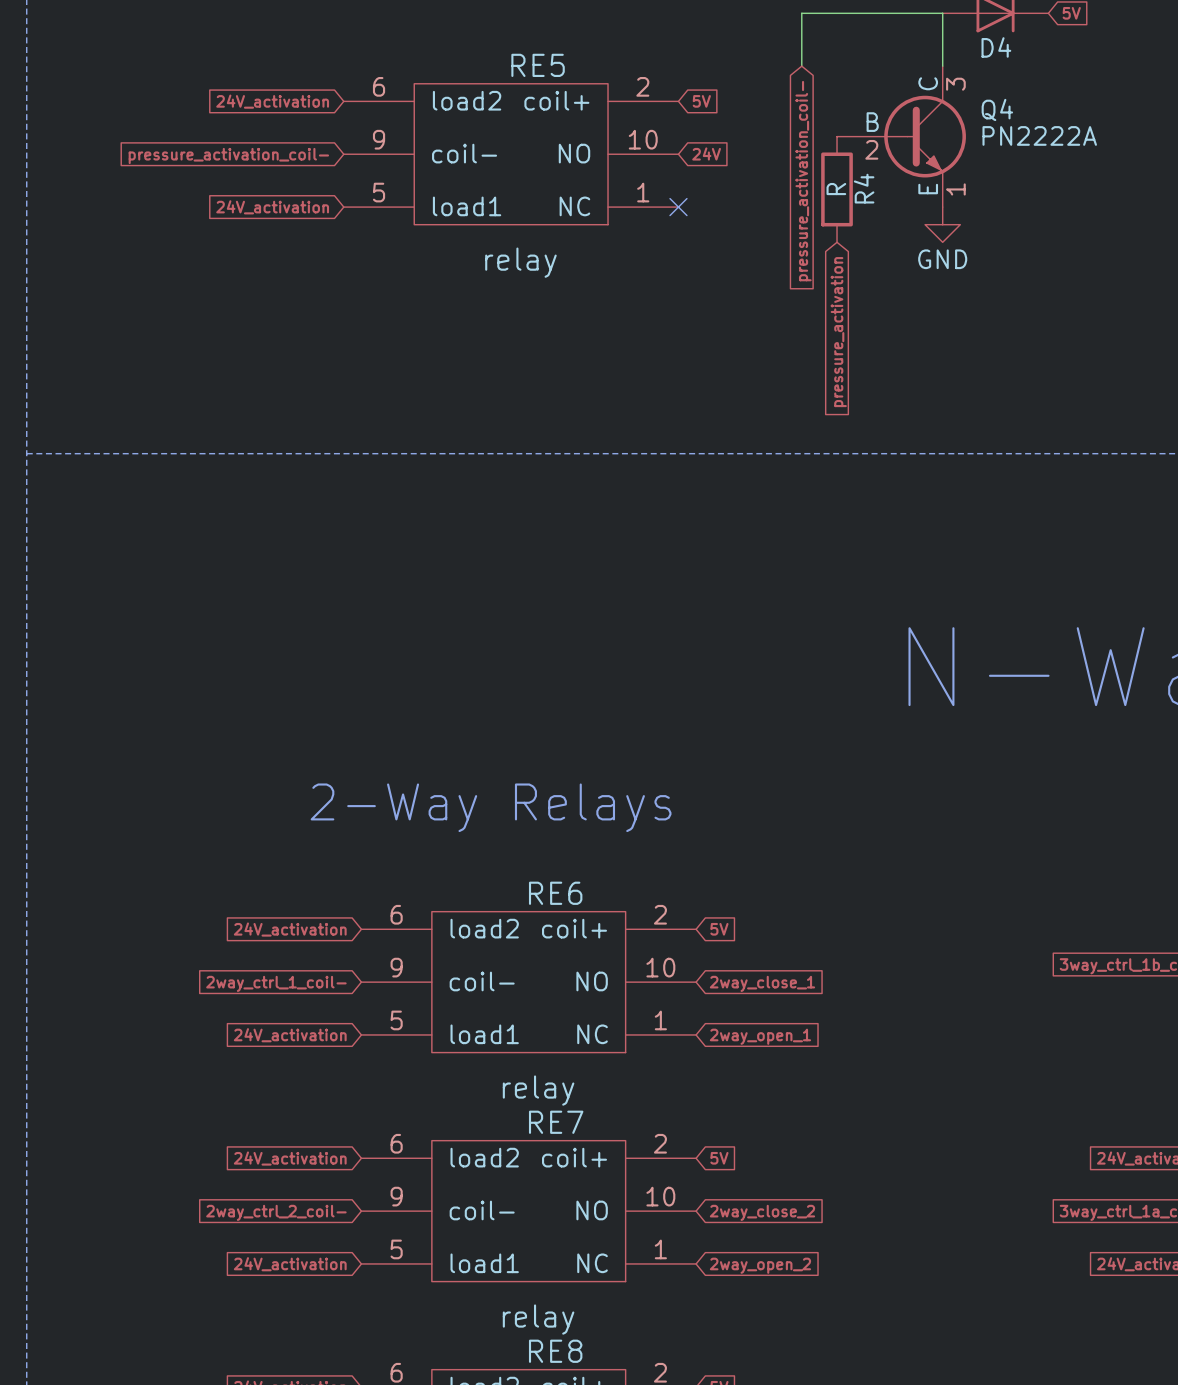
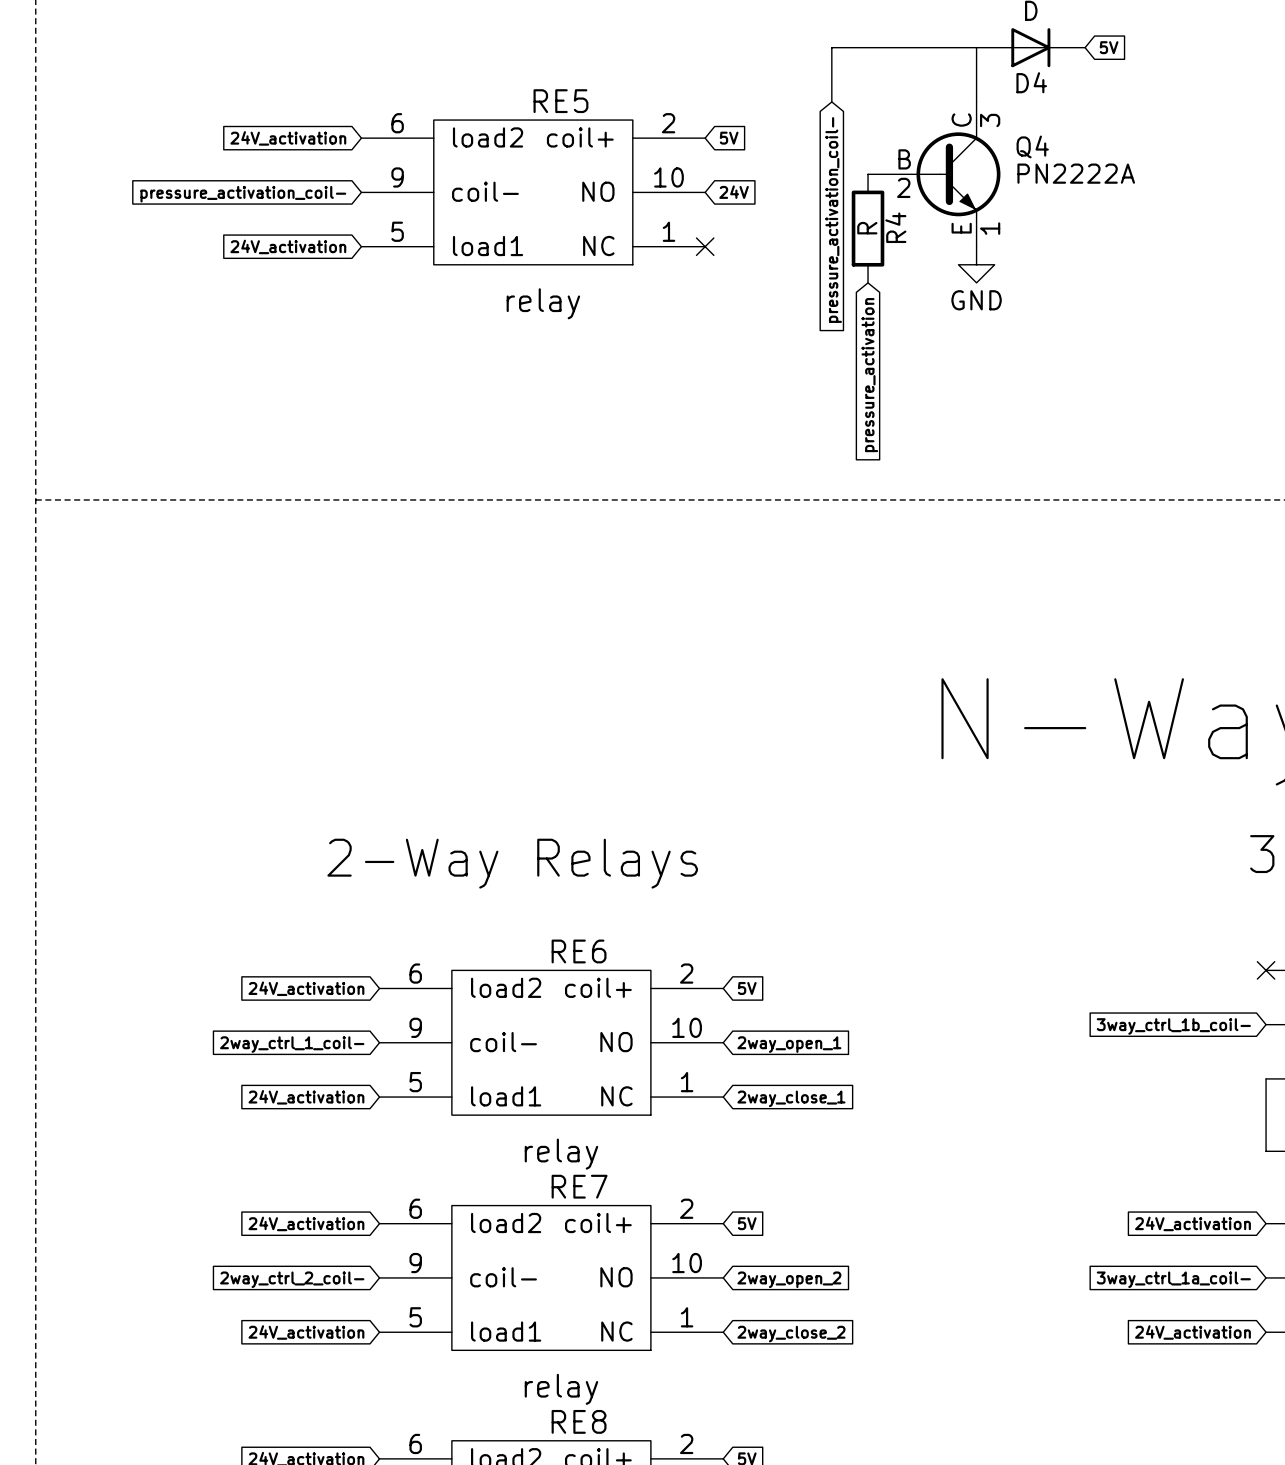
global label: 2way_close_1 (762, 983) -> 2way_open_1 (789, 1044)
global label: 2way_open_1 (760, 1036) -> 2way_close_1 (791, 1098)
global label: 2way_close_2 (762, 1212) -> 2way_open_2 (789, 1279)
global label: 2way_open_2 (760, 1265) -> 2way_close_2 (791, 1334)

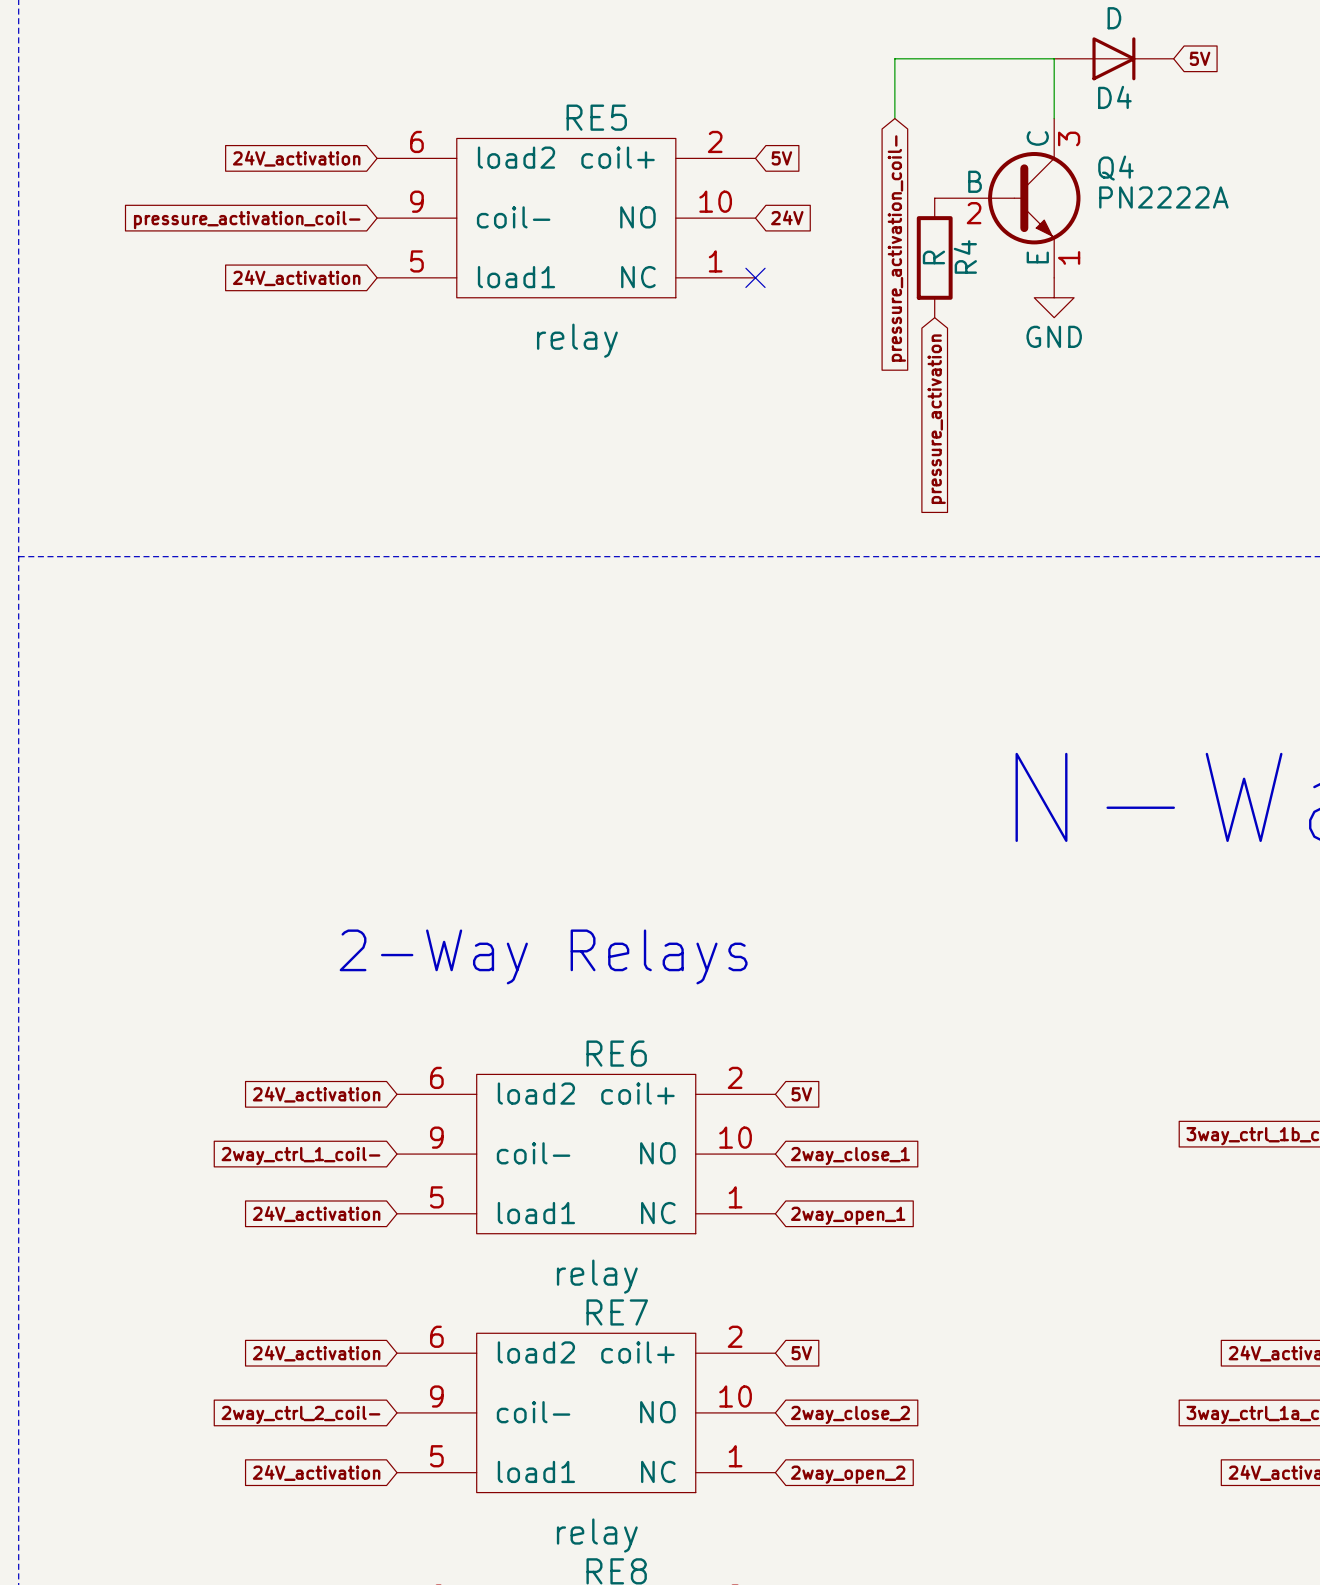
global label: 2way_open_1 (789, 1044) -> 2way_close_1 (850, 1156)
global label: 2way_close_1 (791, 1098) -> 2way_open_1 (848, 1215)
global label: 2way_open_2 (789, 1279) -> 2way_close_2 (850, 1414)
global label: 2way_close_2 (791, 1334) -> 2way_open_2 (848, 1474)

